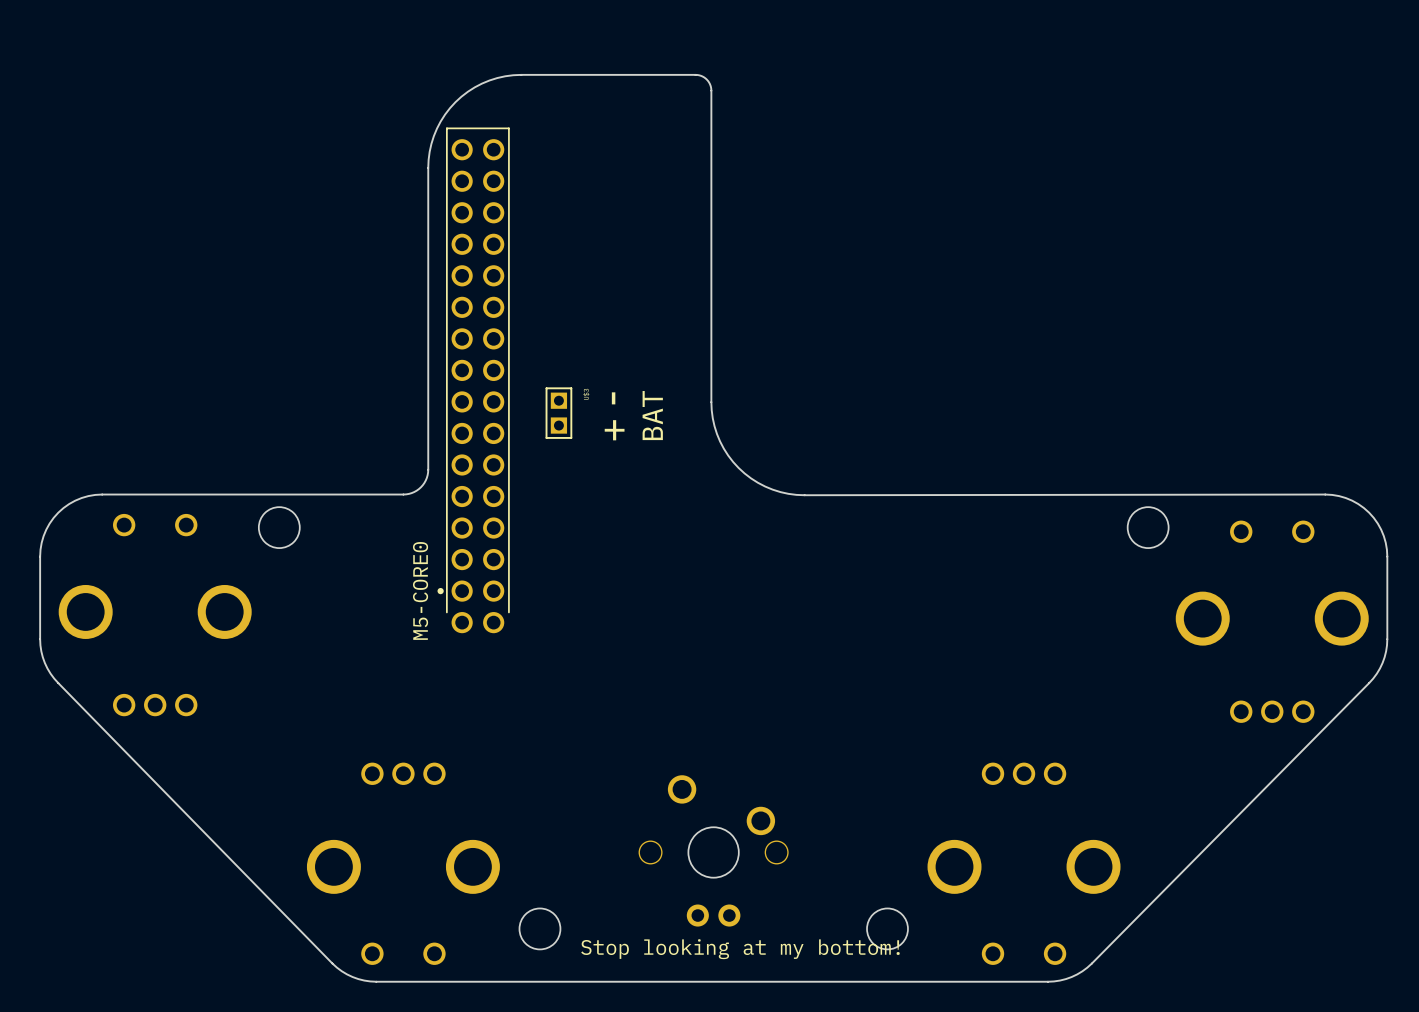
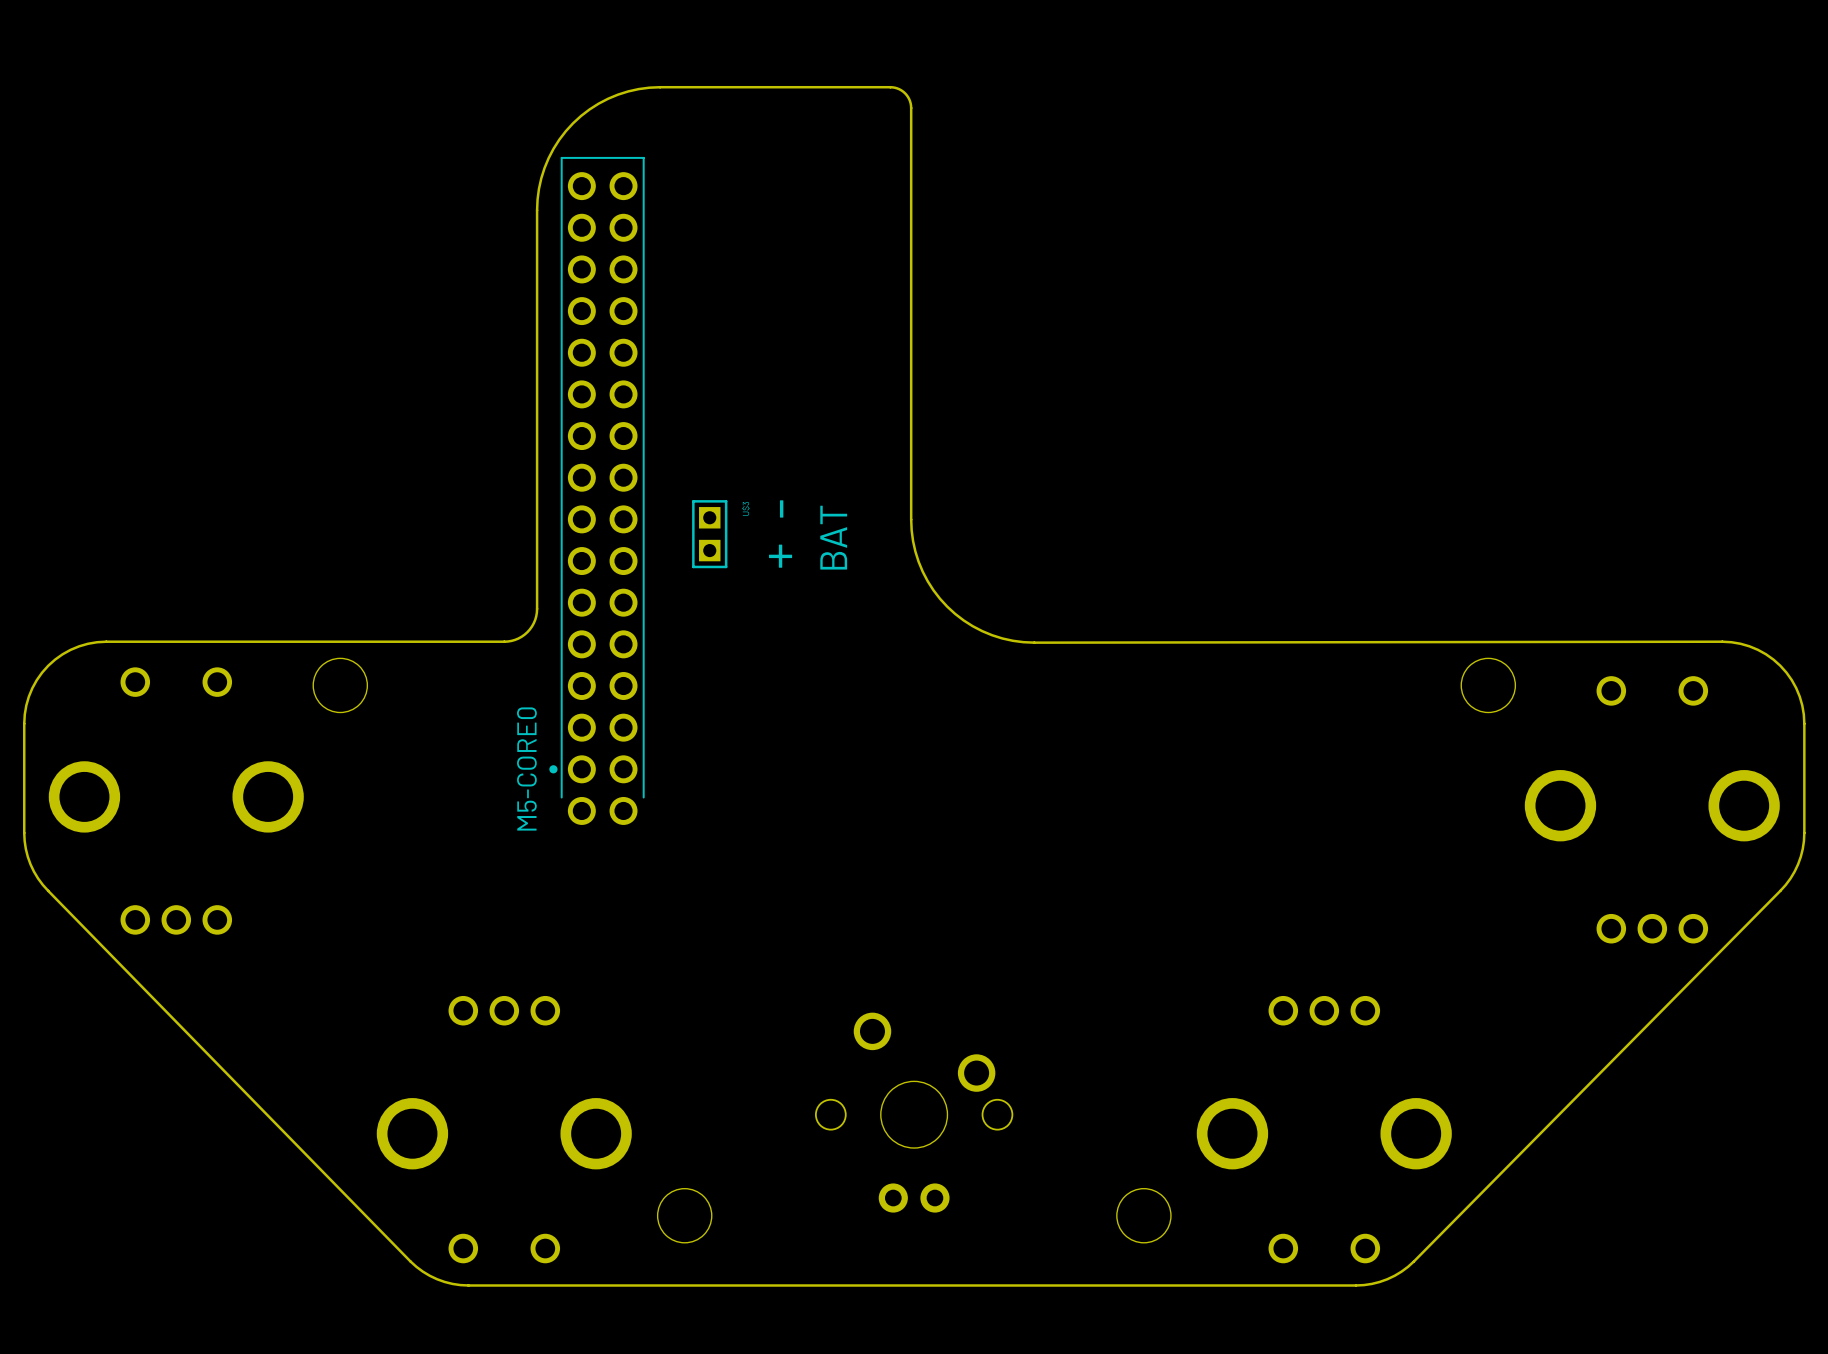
text: Stop looking at my bottom! (740, 949) -> none

